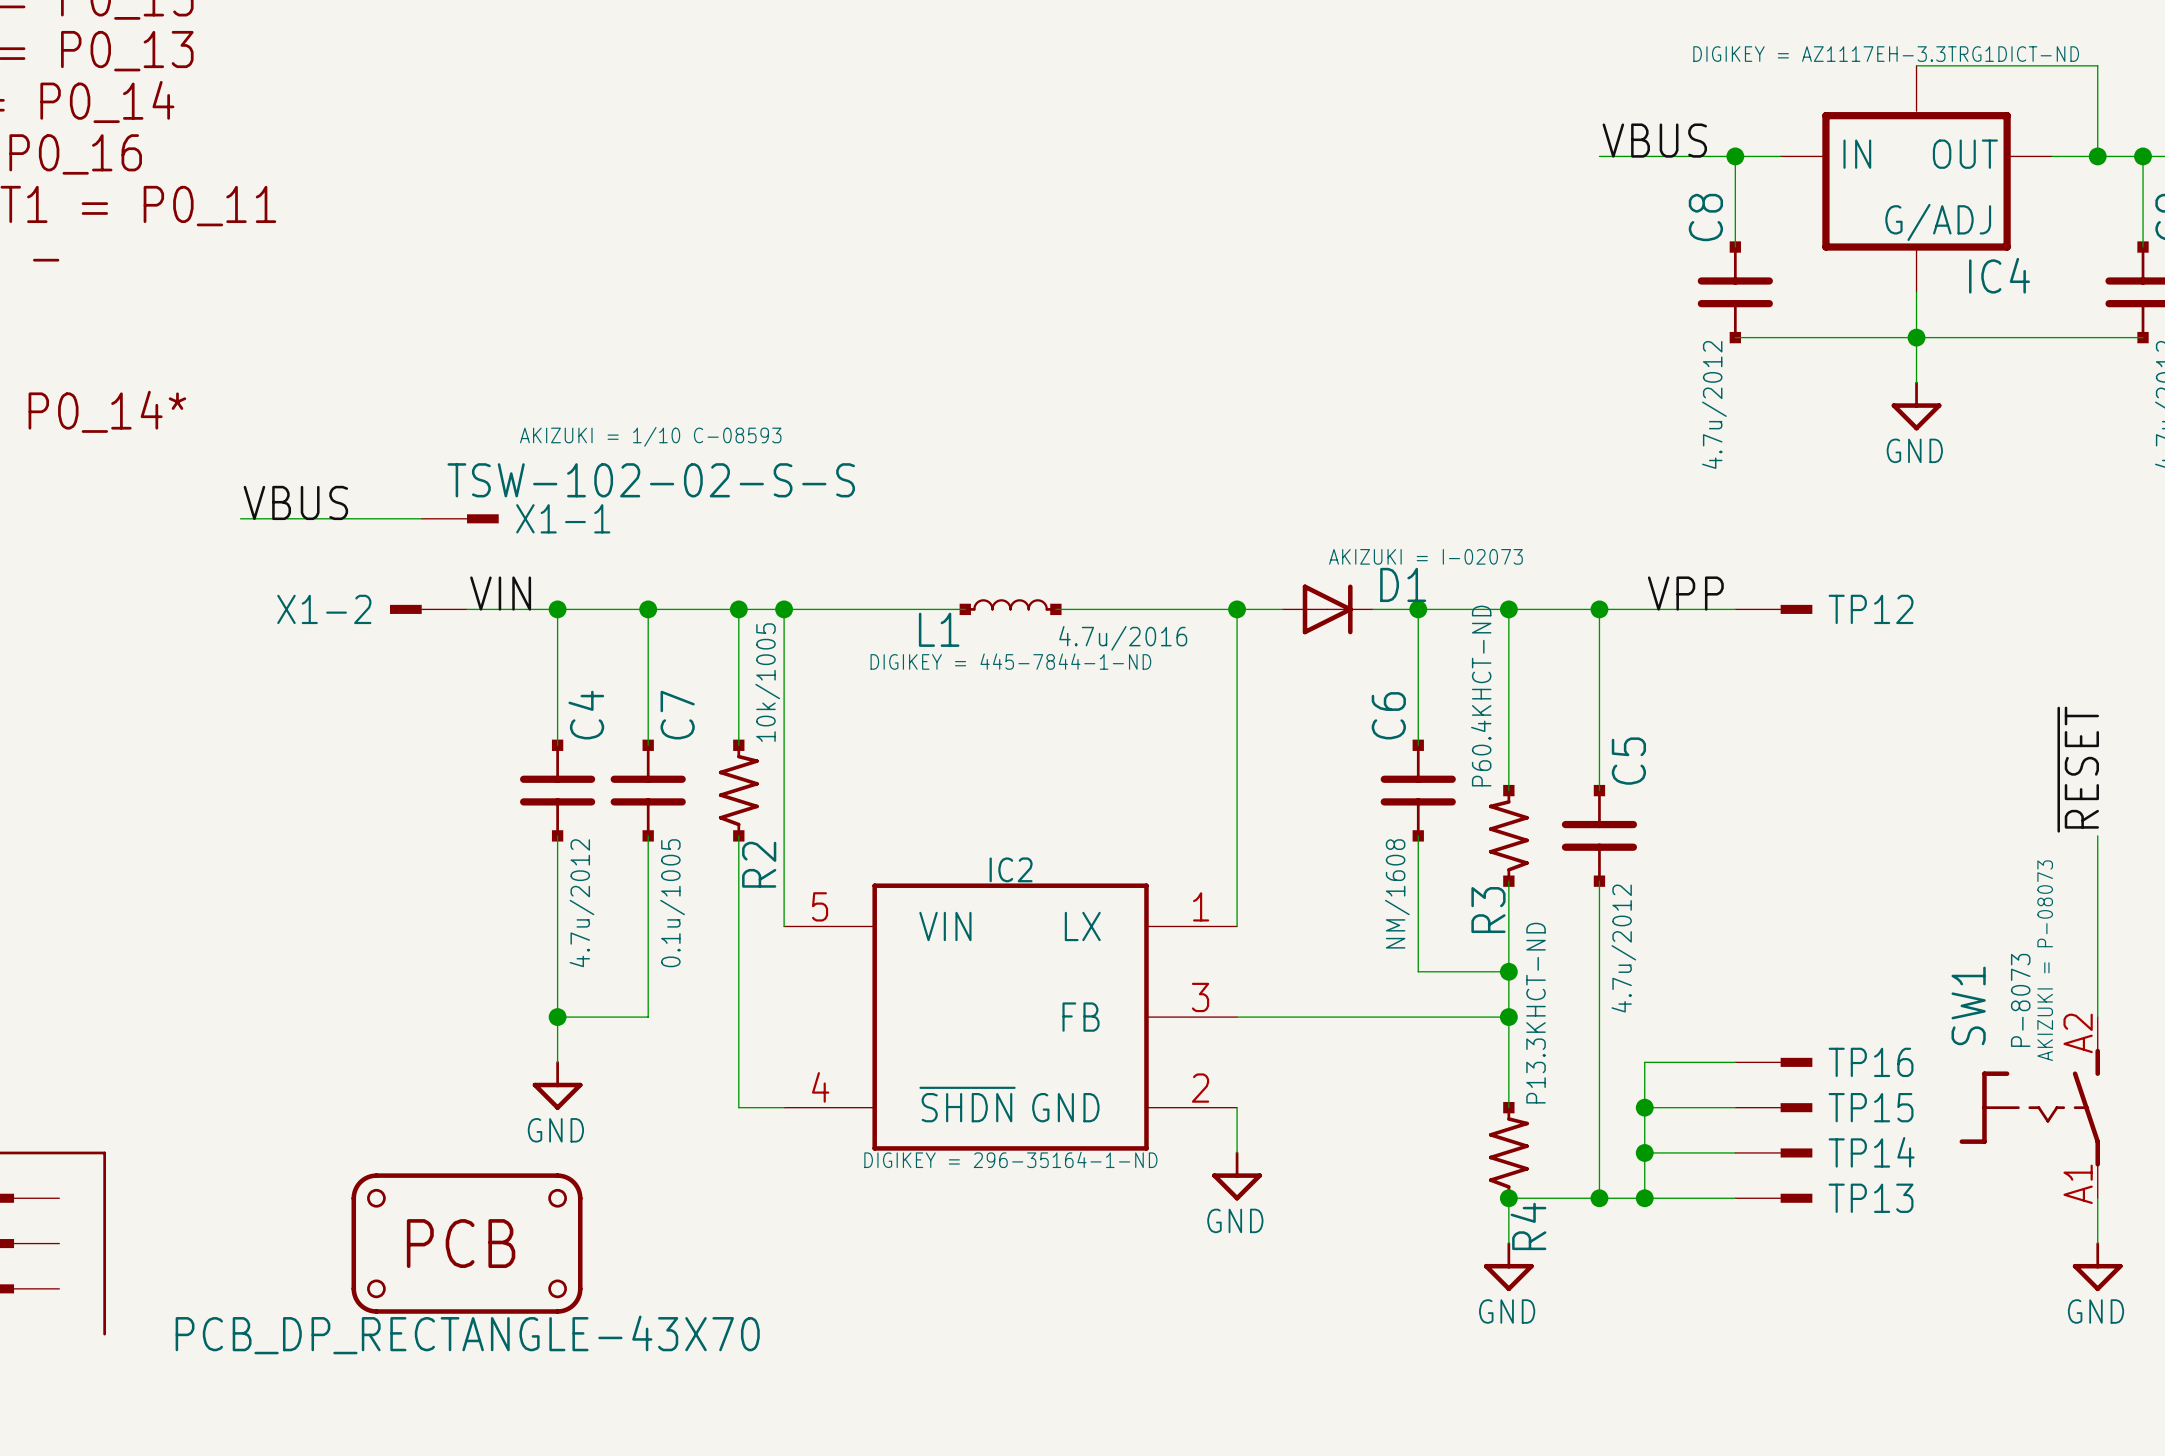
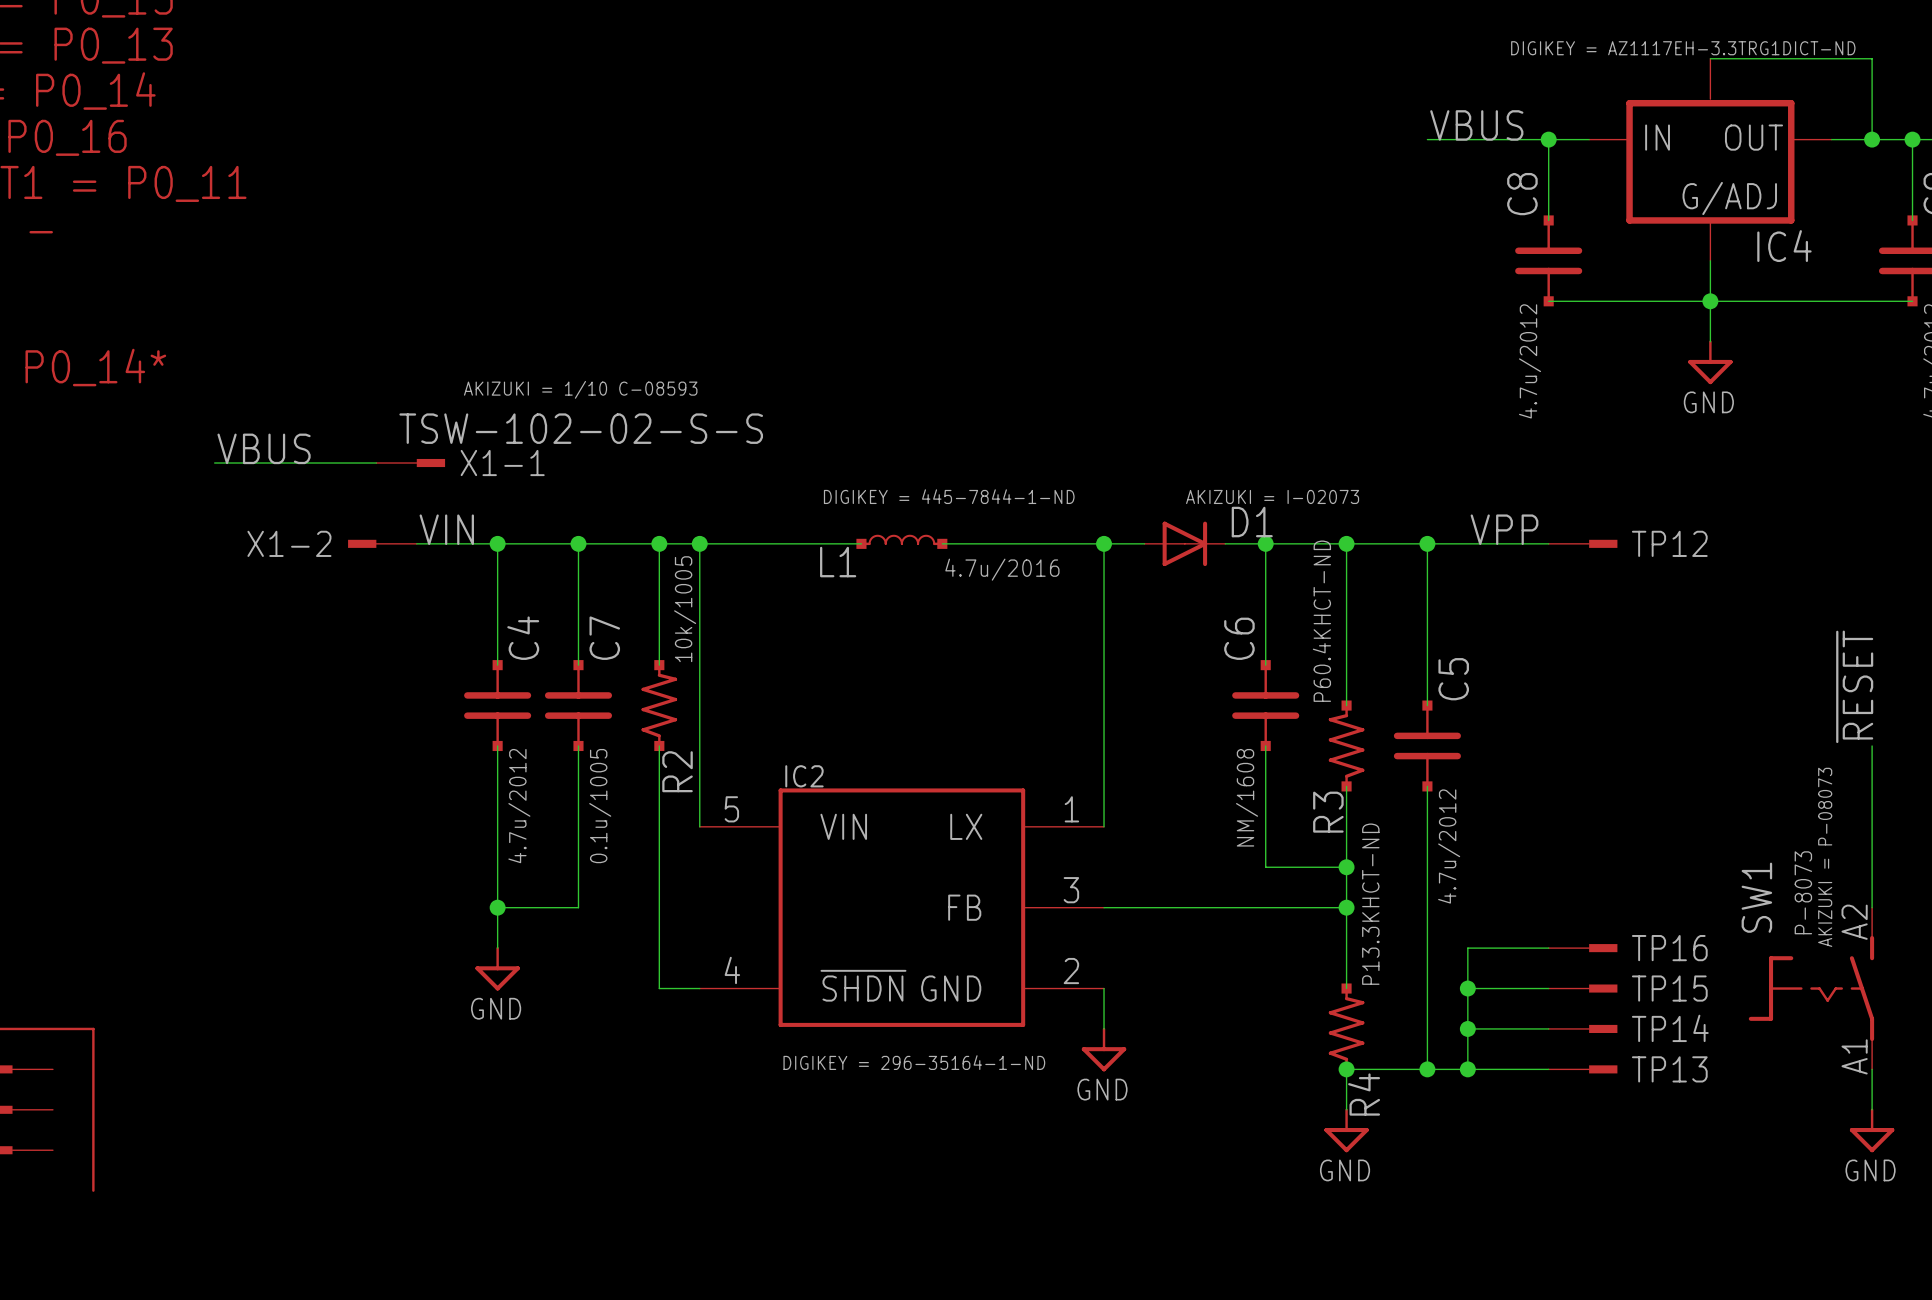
L1 text position: DIGIKEY = 445-7844-1-ND (1010, 661) -> DIGIKEY = 445-7844-1-ND (949, 496)
IC2 name position: IC2 (1011, 869) -> IC2 (804, 776)
IC2 text position: DIGIKEY = 296-35164-1-ND (1010, 1159) -> DIGIKEY = 296-35164-1-ND (914, 1062)
part: PCB_DP_RECTANGLE-43X70 (467, 1243) -> none

